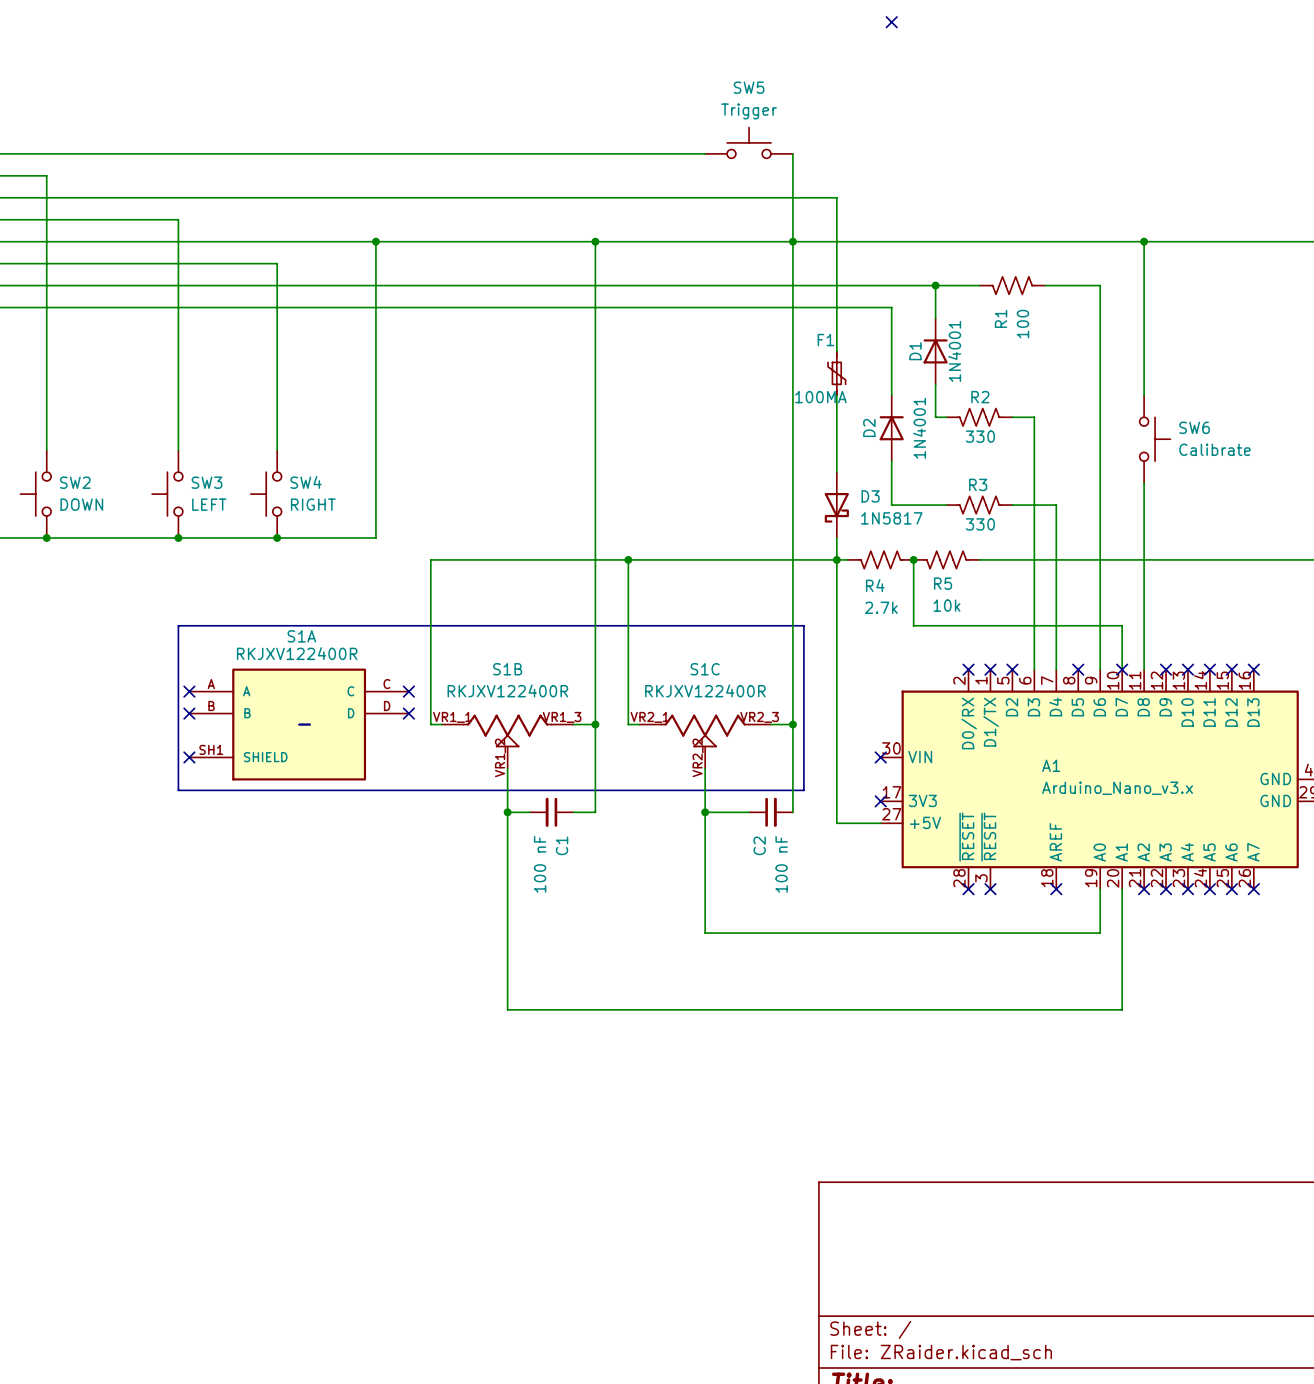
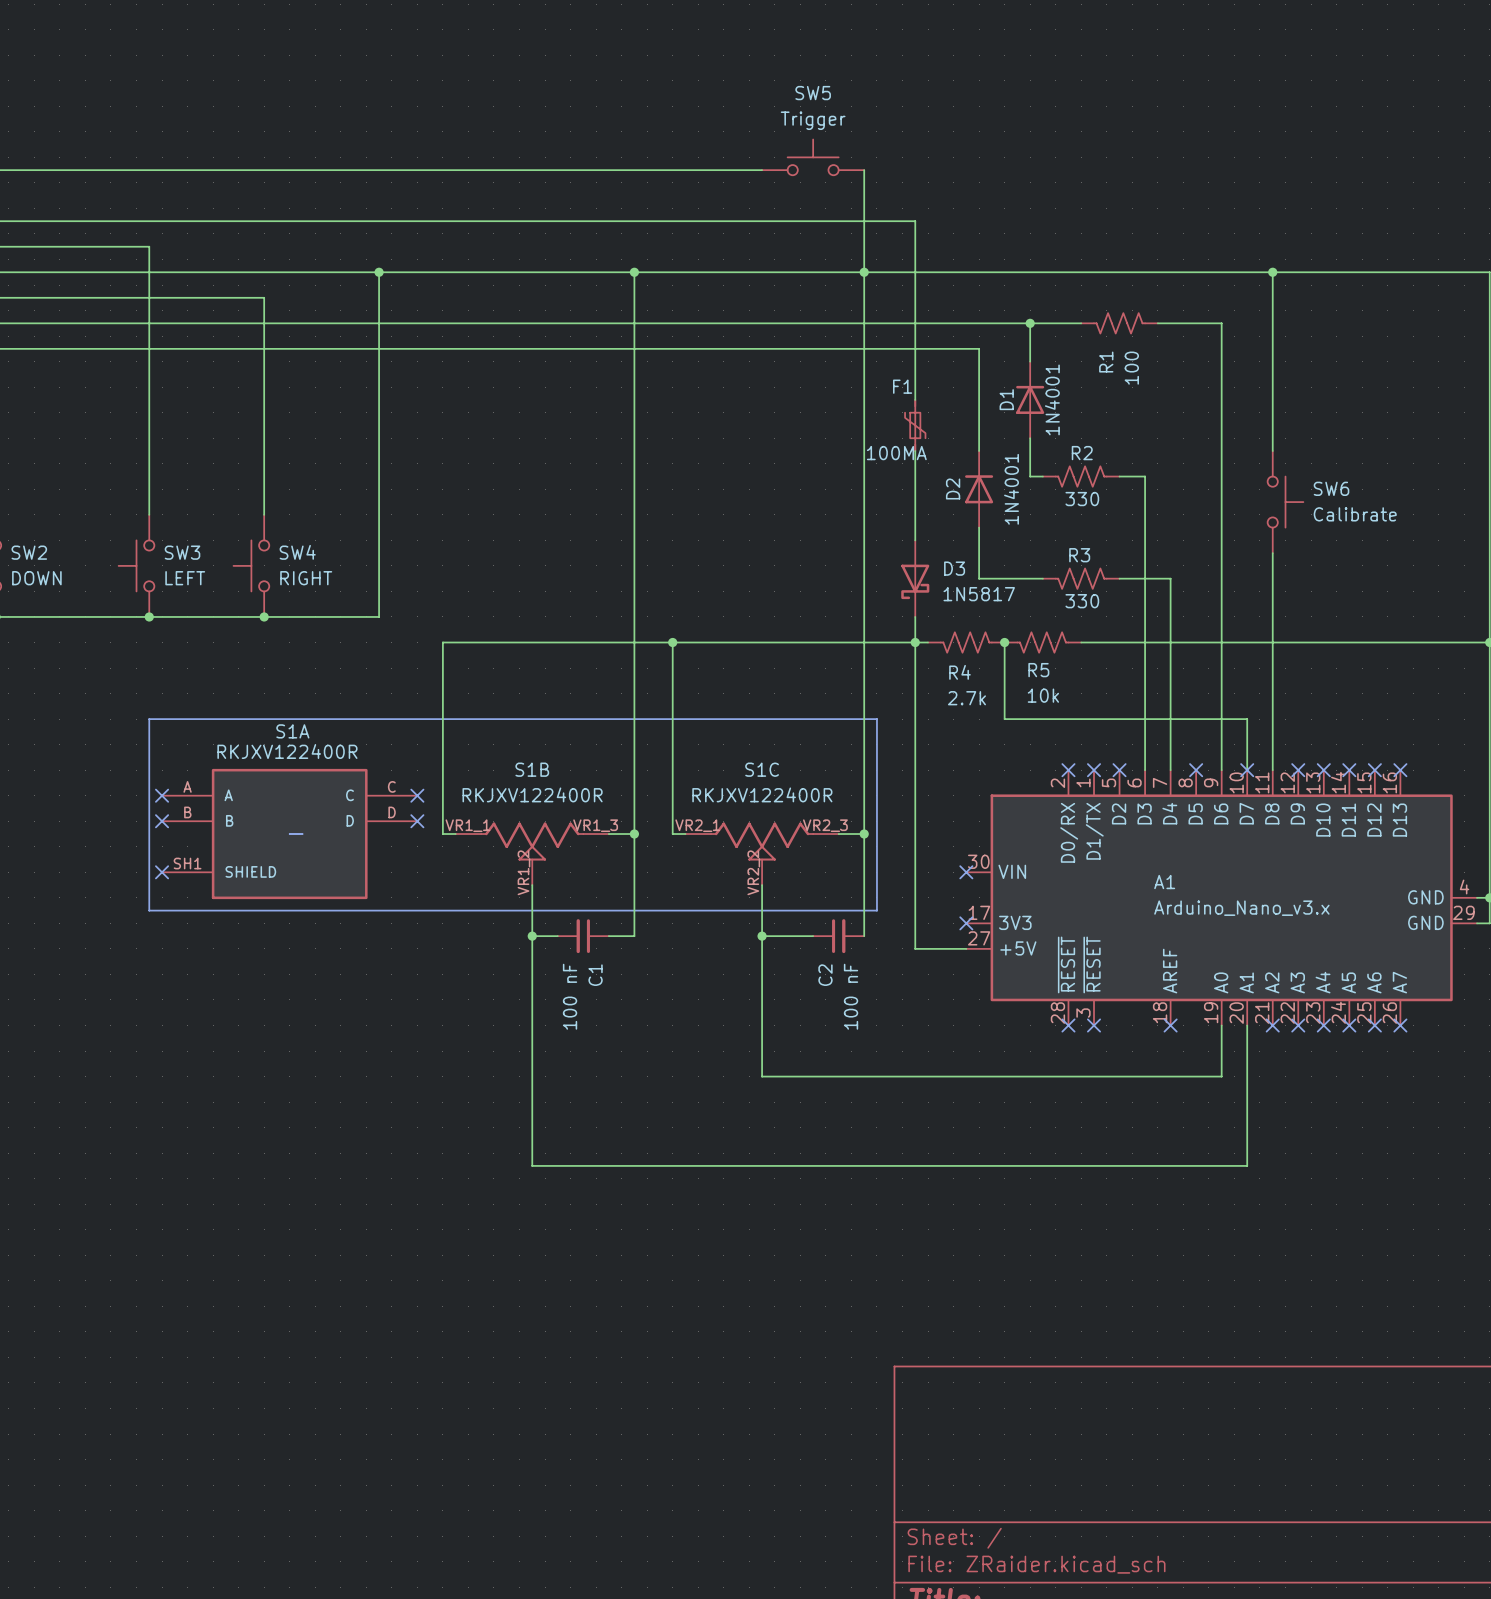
no-connect mark: (891, 22) -> none

